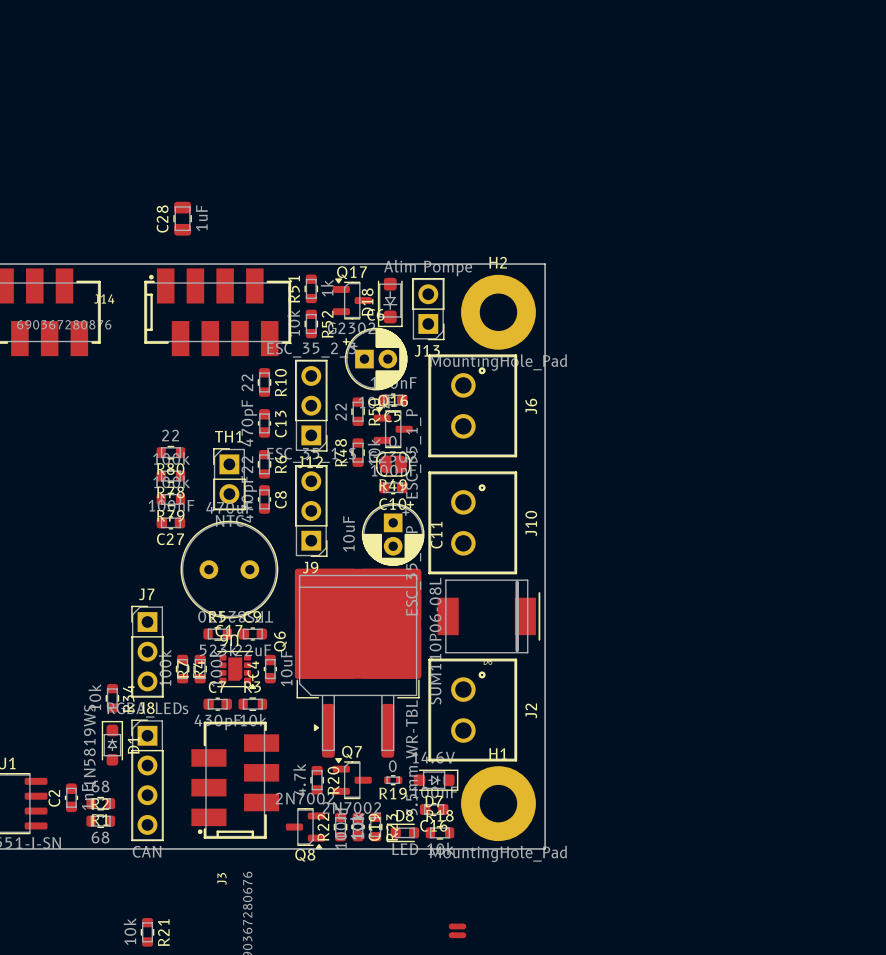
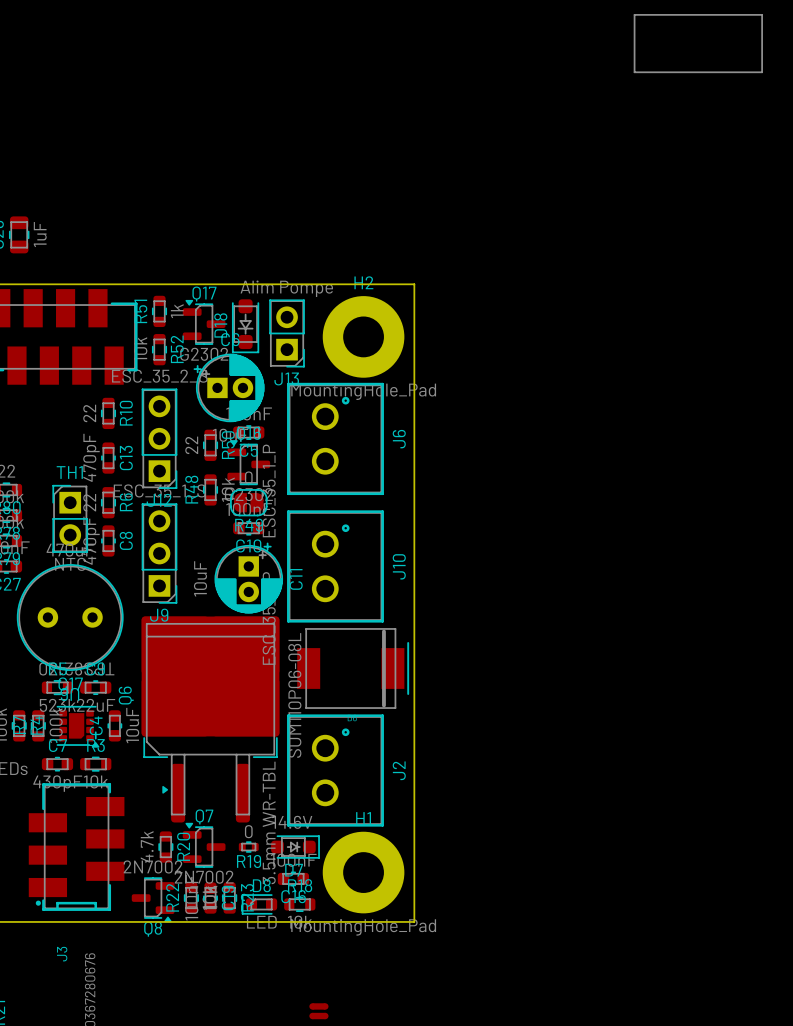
line: none -> (634, 14) (762, 14) (762, 72) (634, 72) (634, 14)

